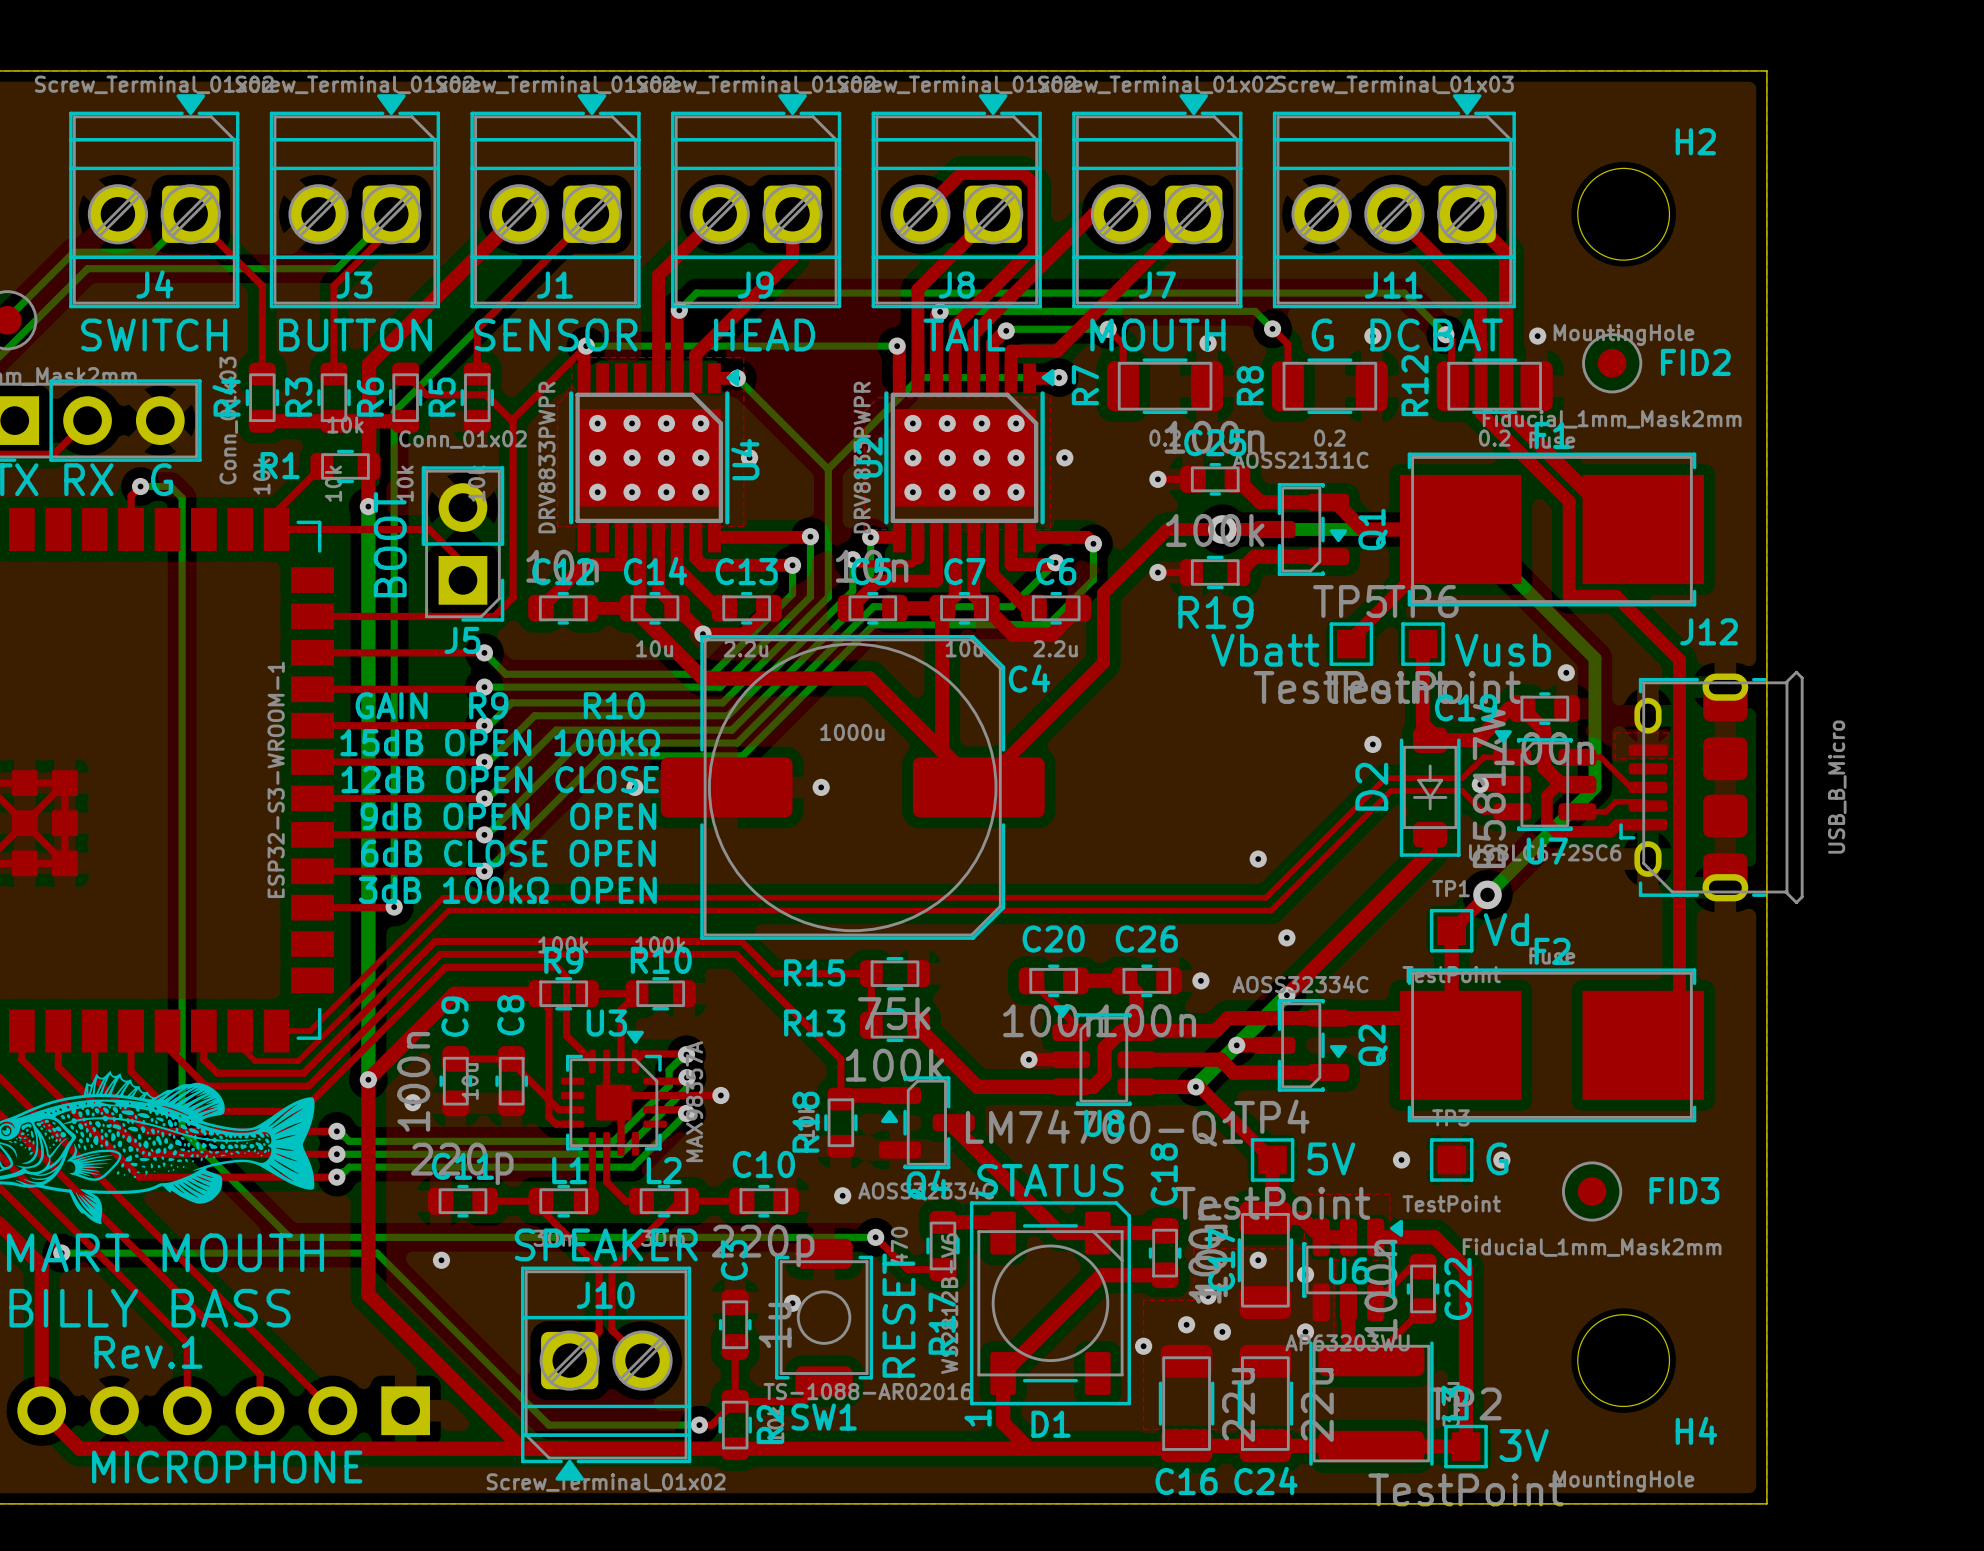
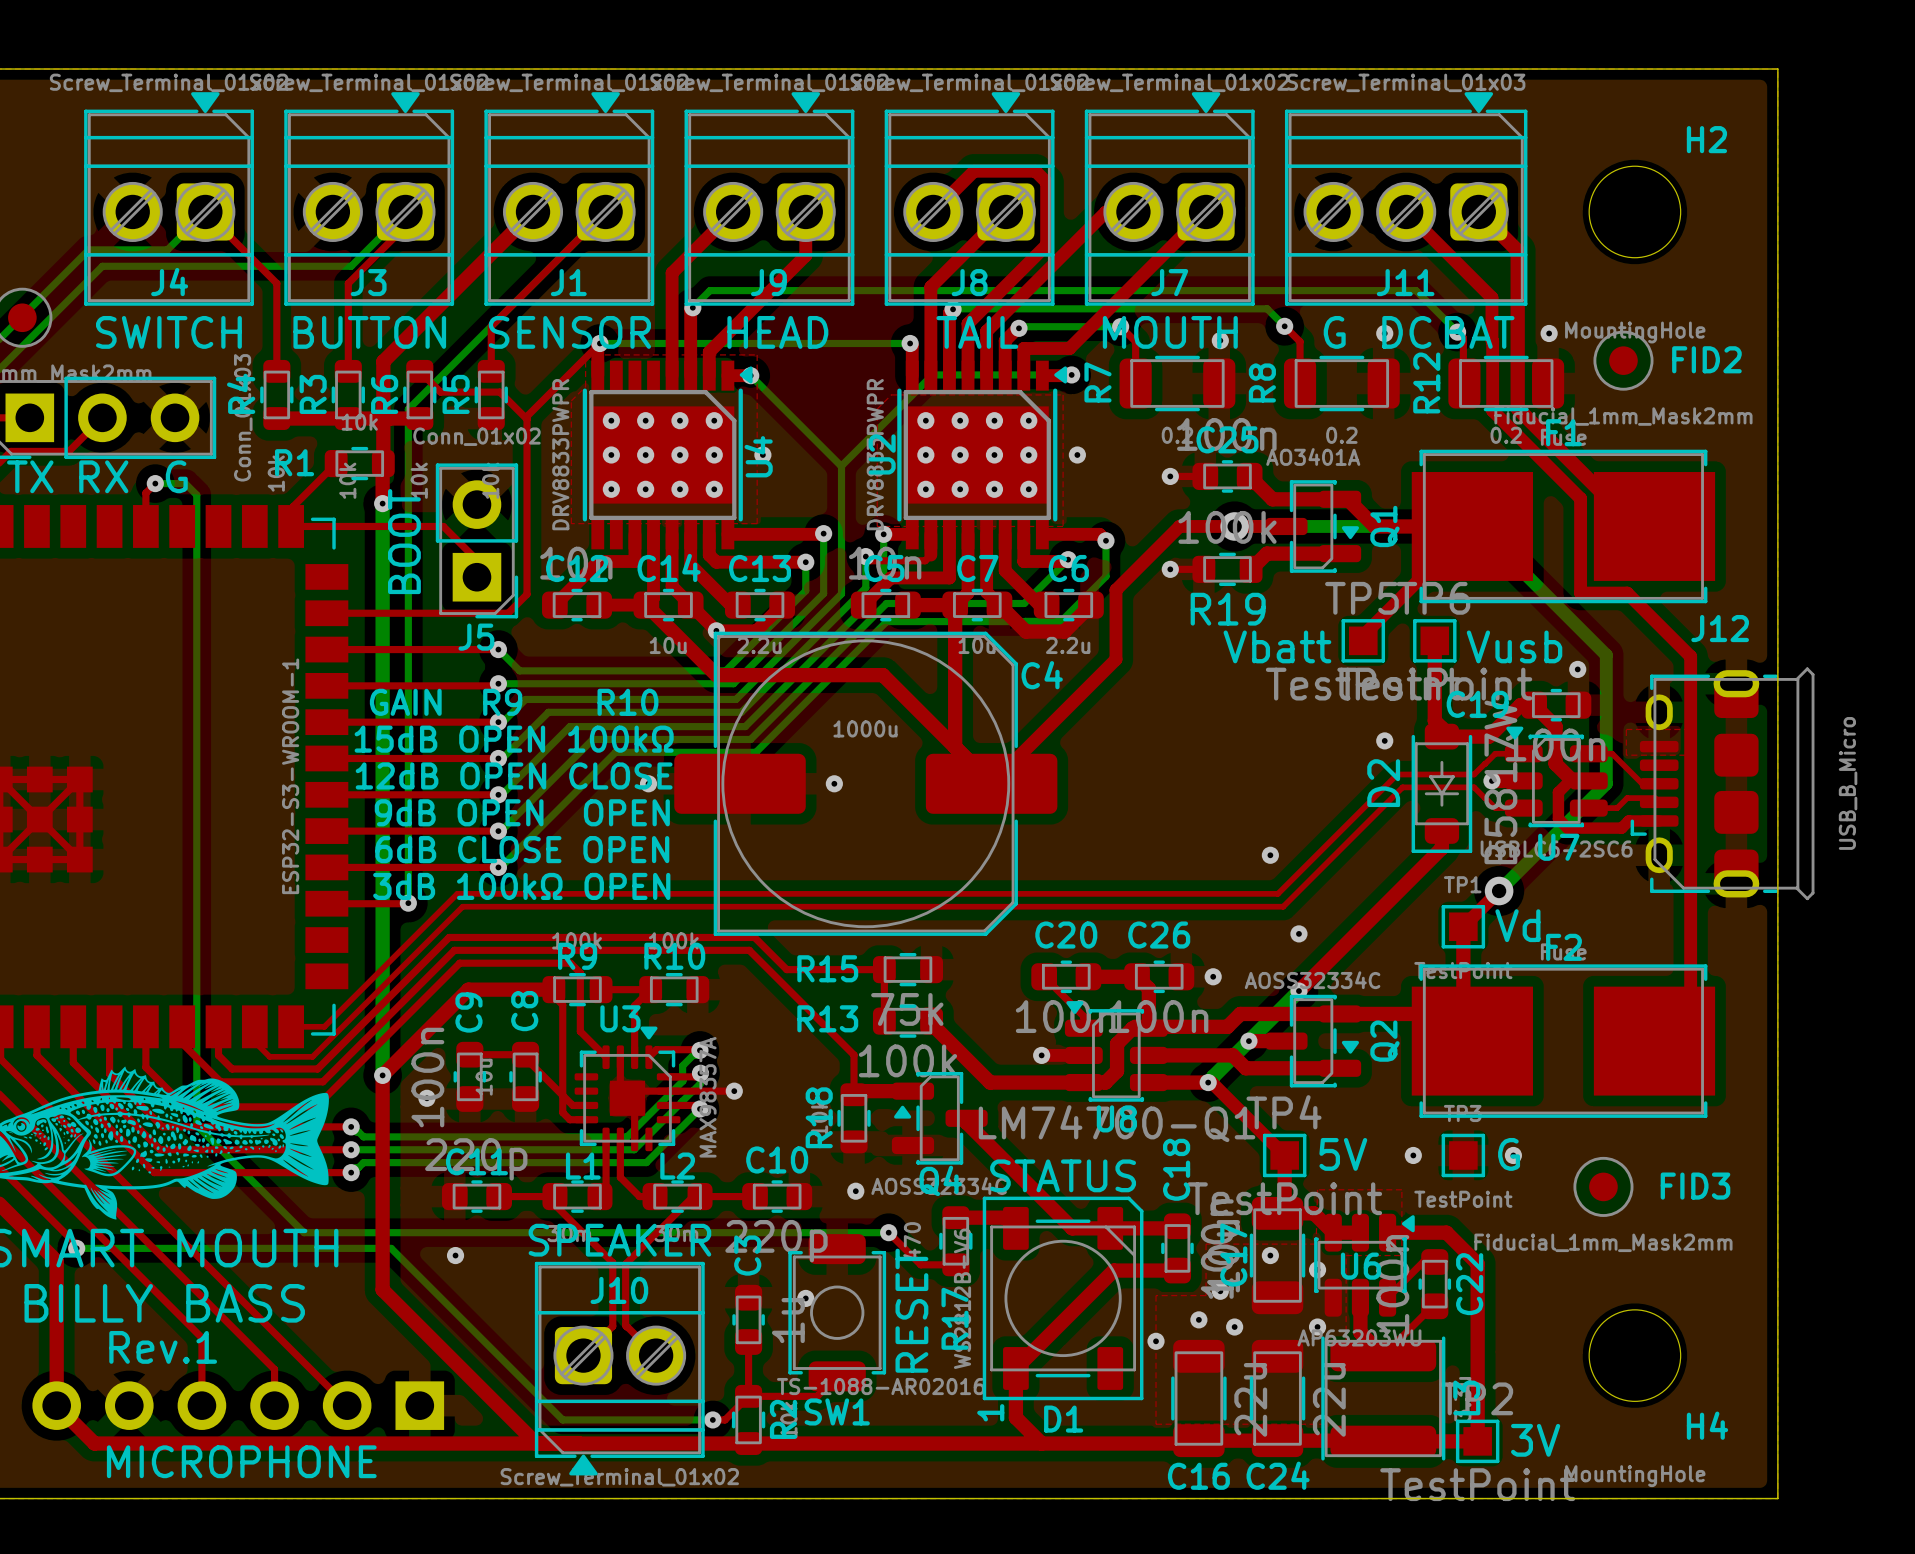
Q1 value: AOSS21311C (1300, 460) -> AO3401A (1313, 456)

